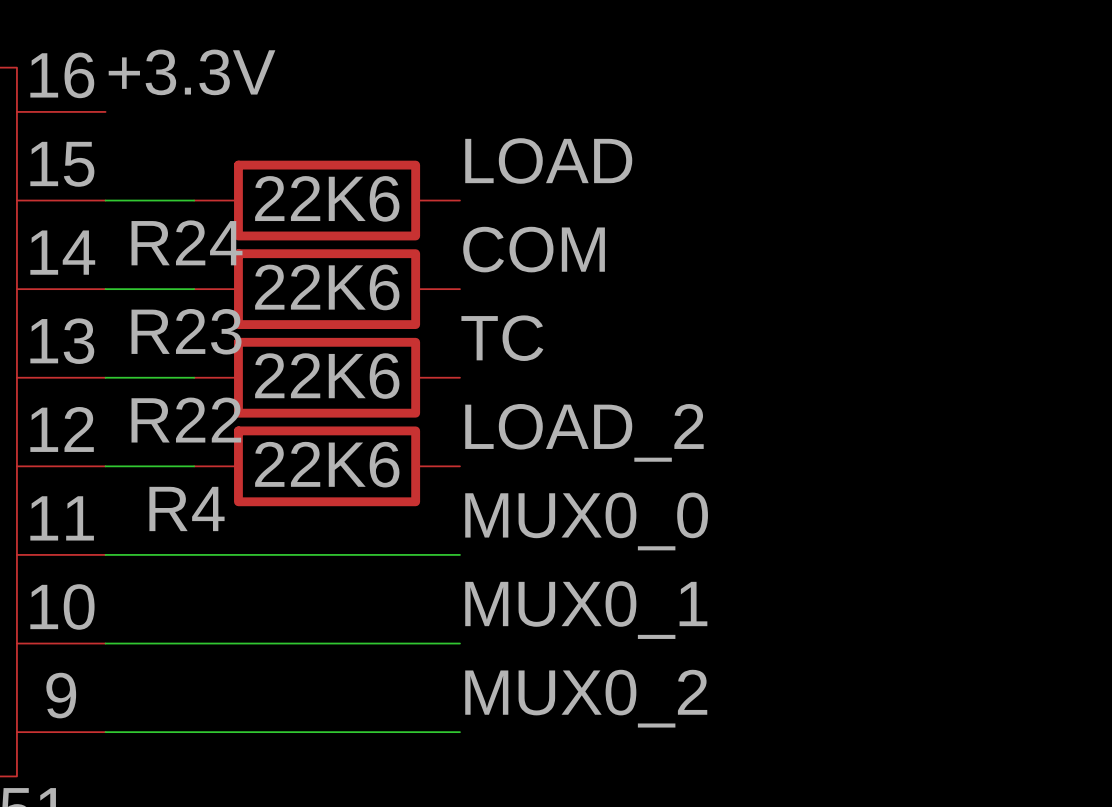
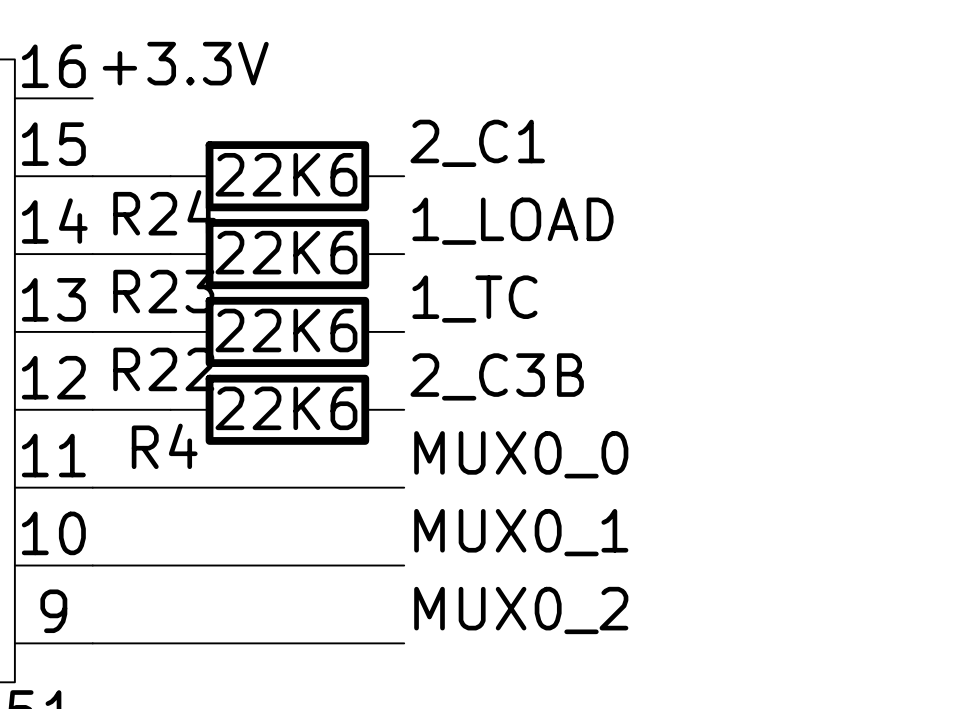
label: LOAD (548, 160) -> 2_C1 (477, 143)
label: COM (534, 249) -> 1_LOAD (512, 221)
label: TC (502, 338) -> 1_TC (474, 299)
label: LOAD_2 (584, 432) -> 2_C3B (497, 376)

